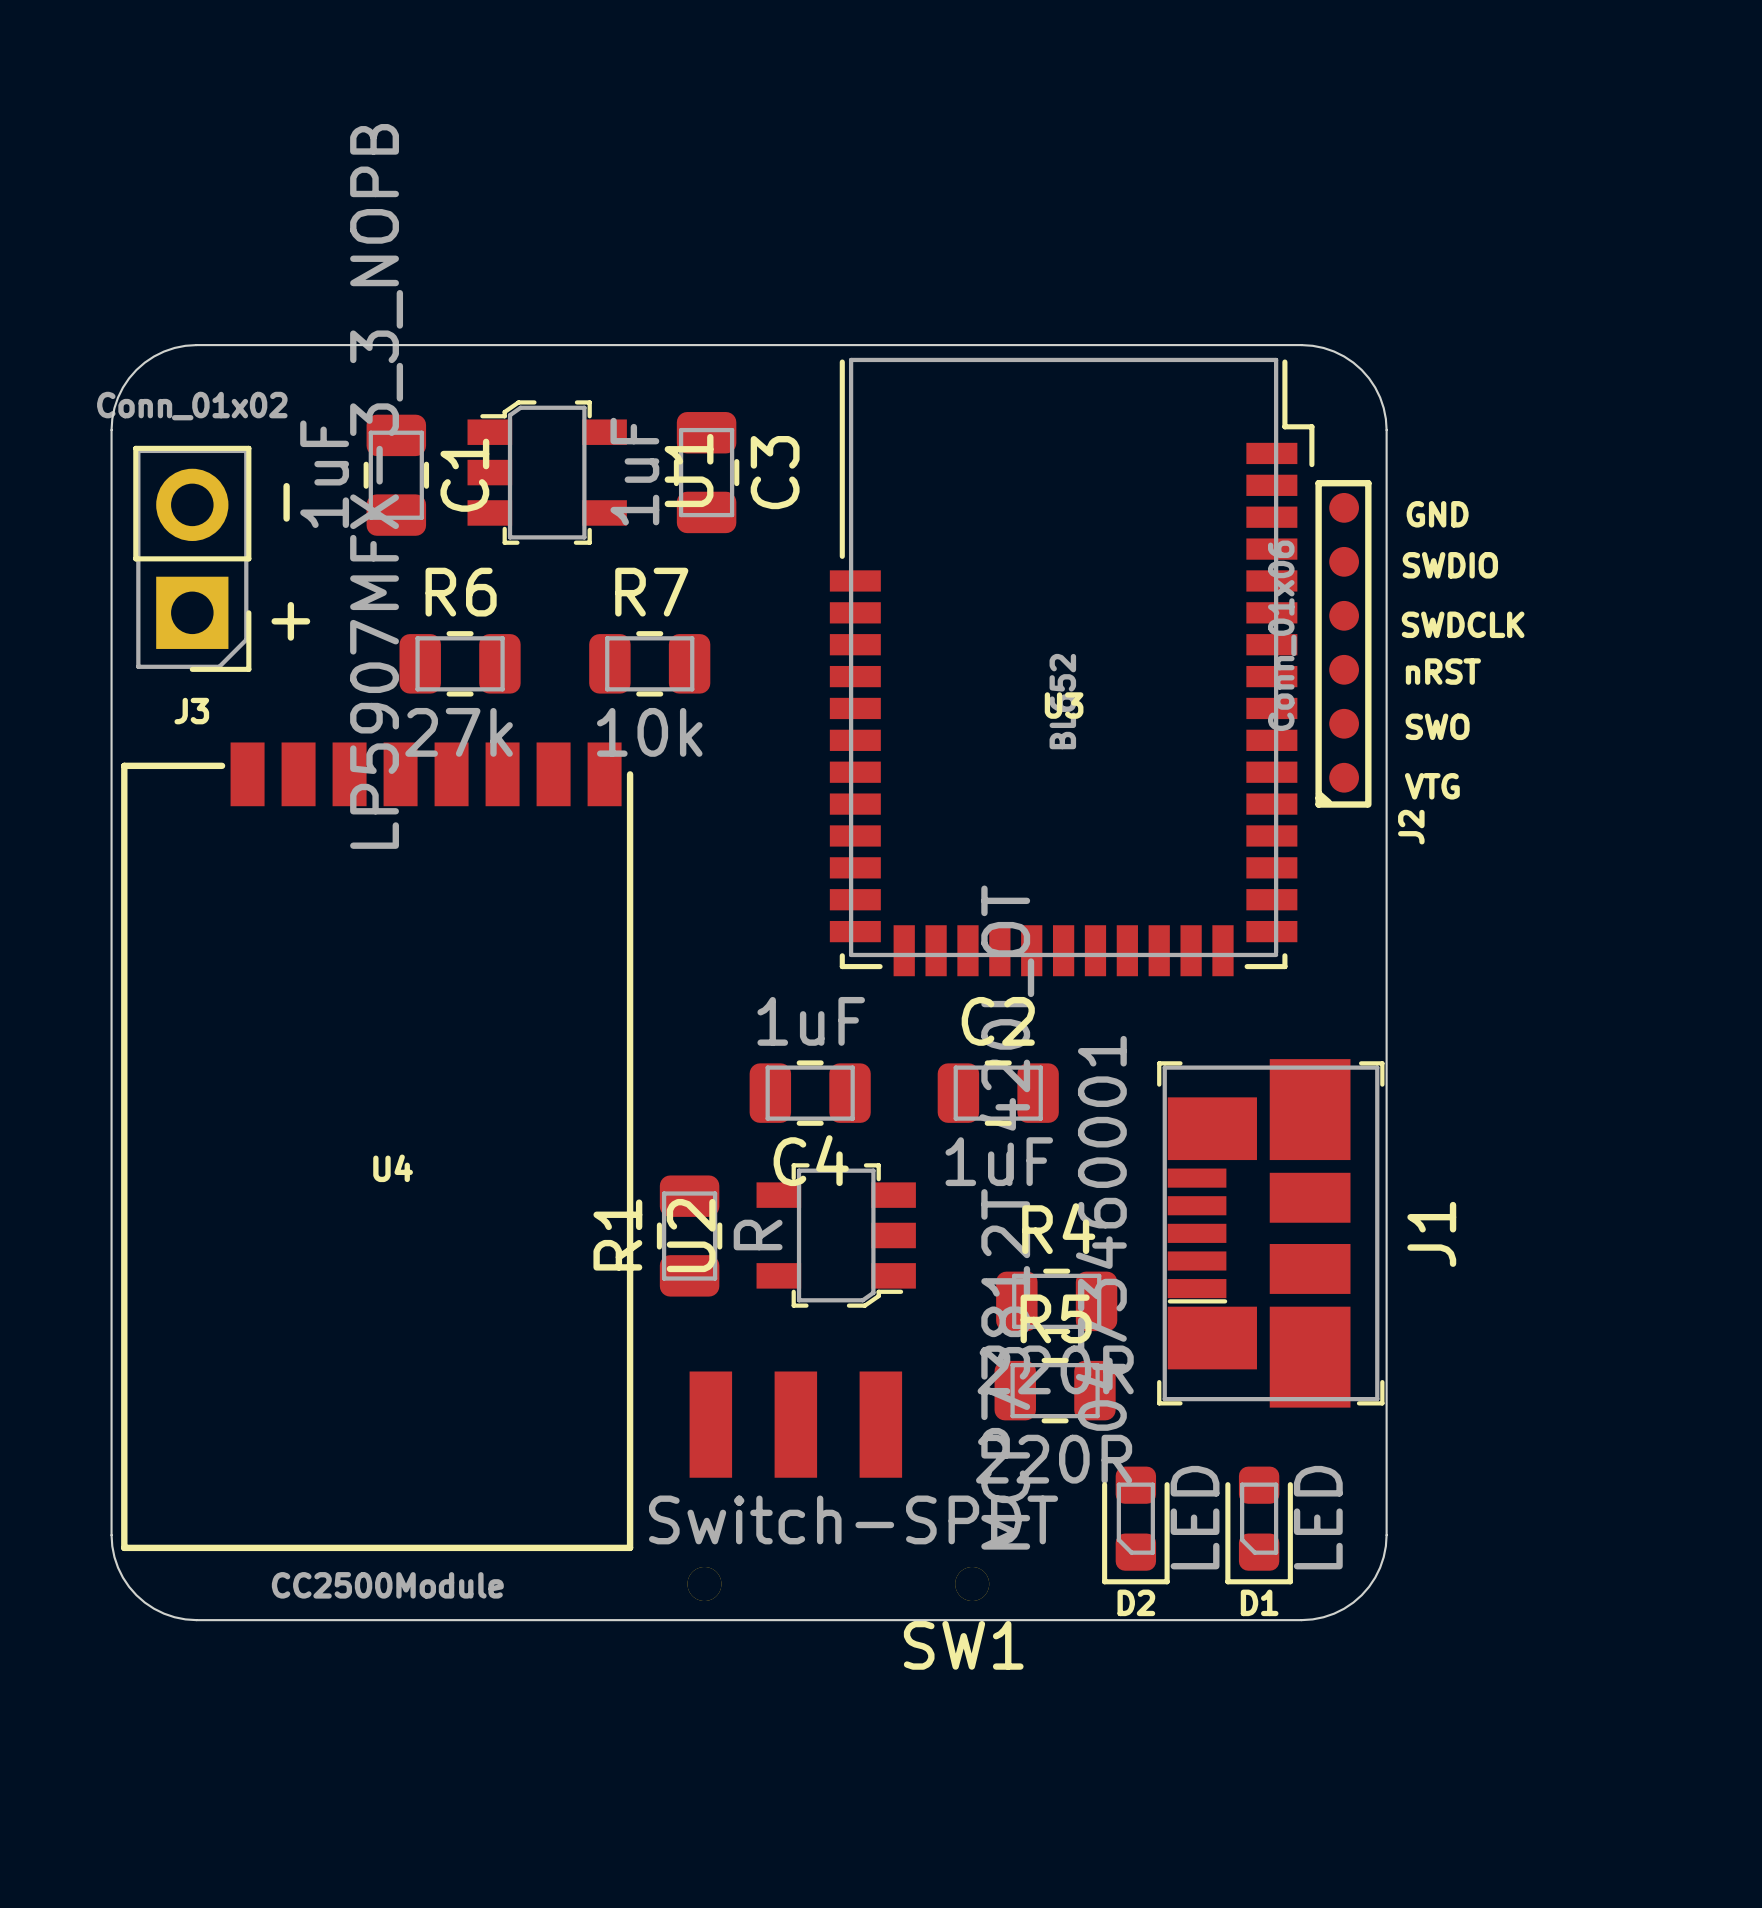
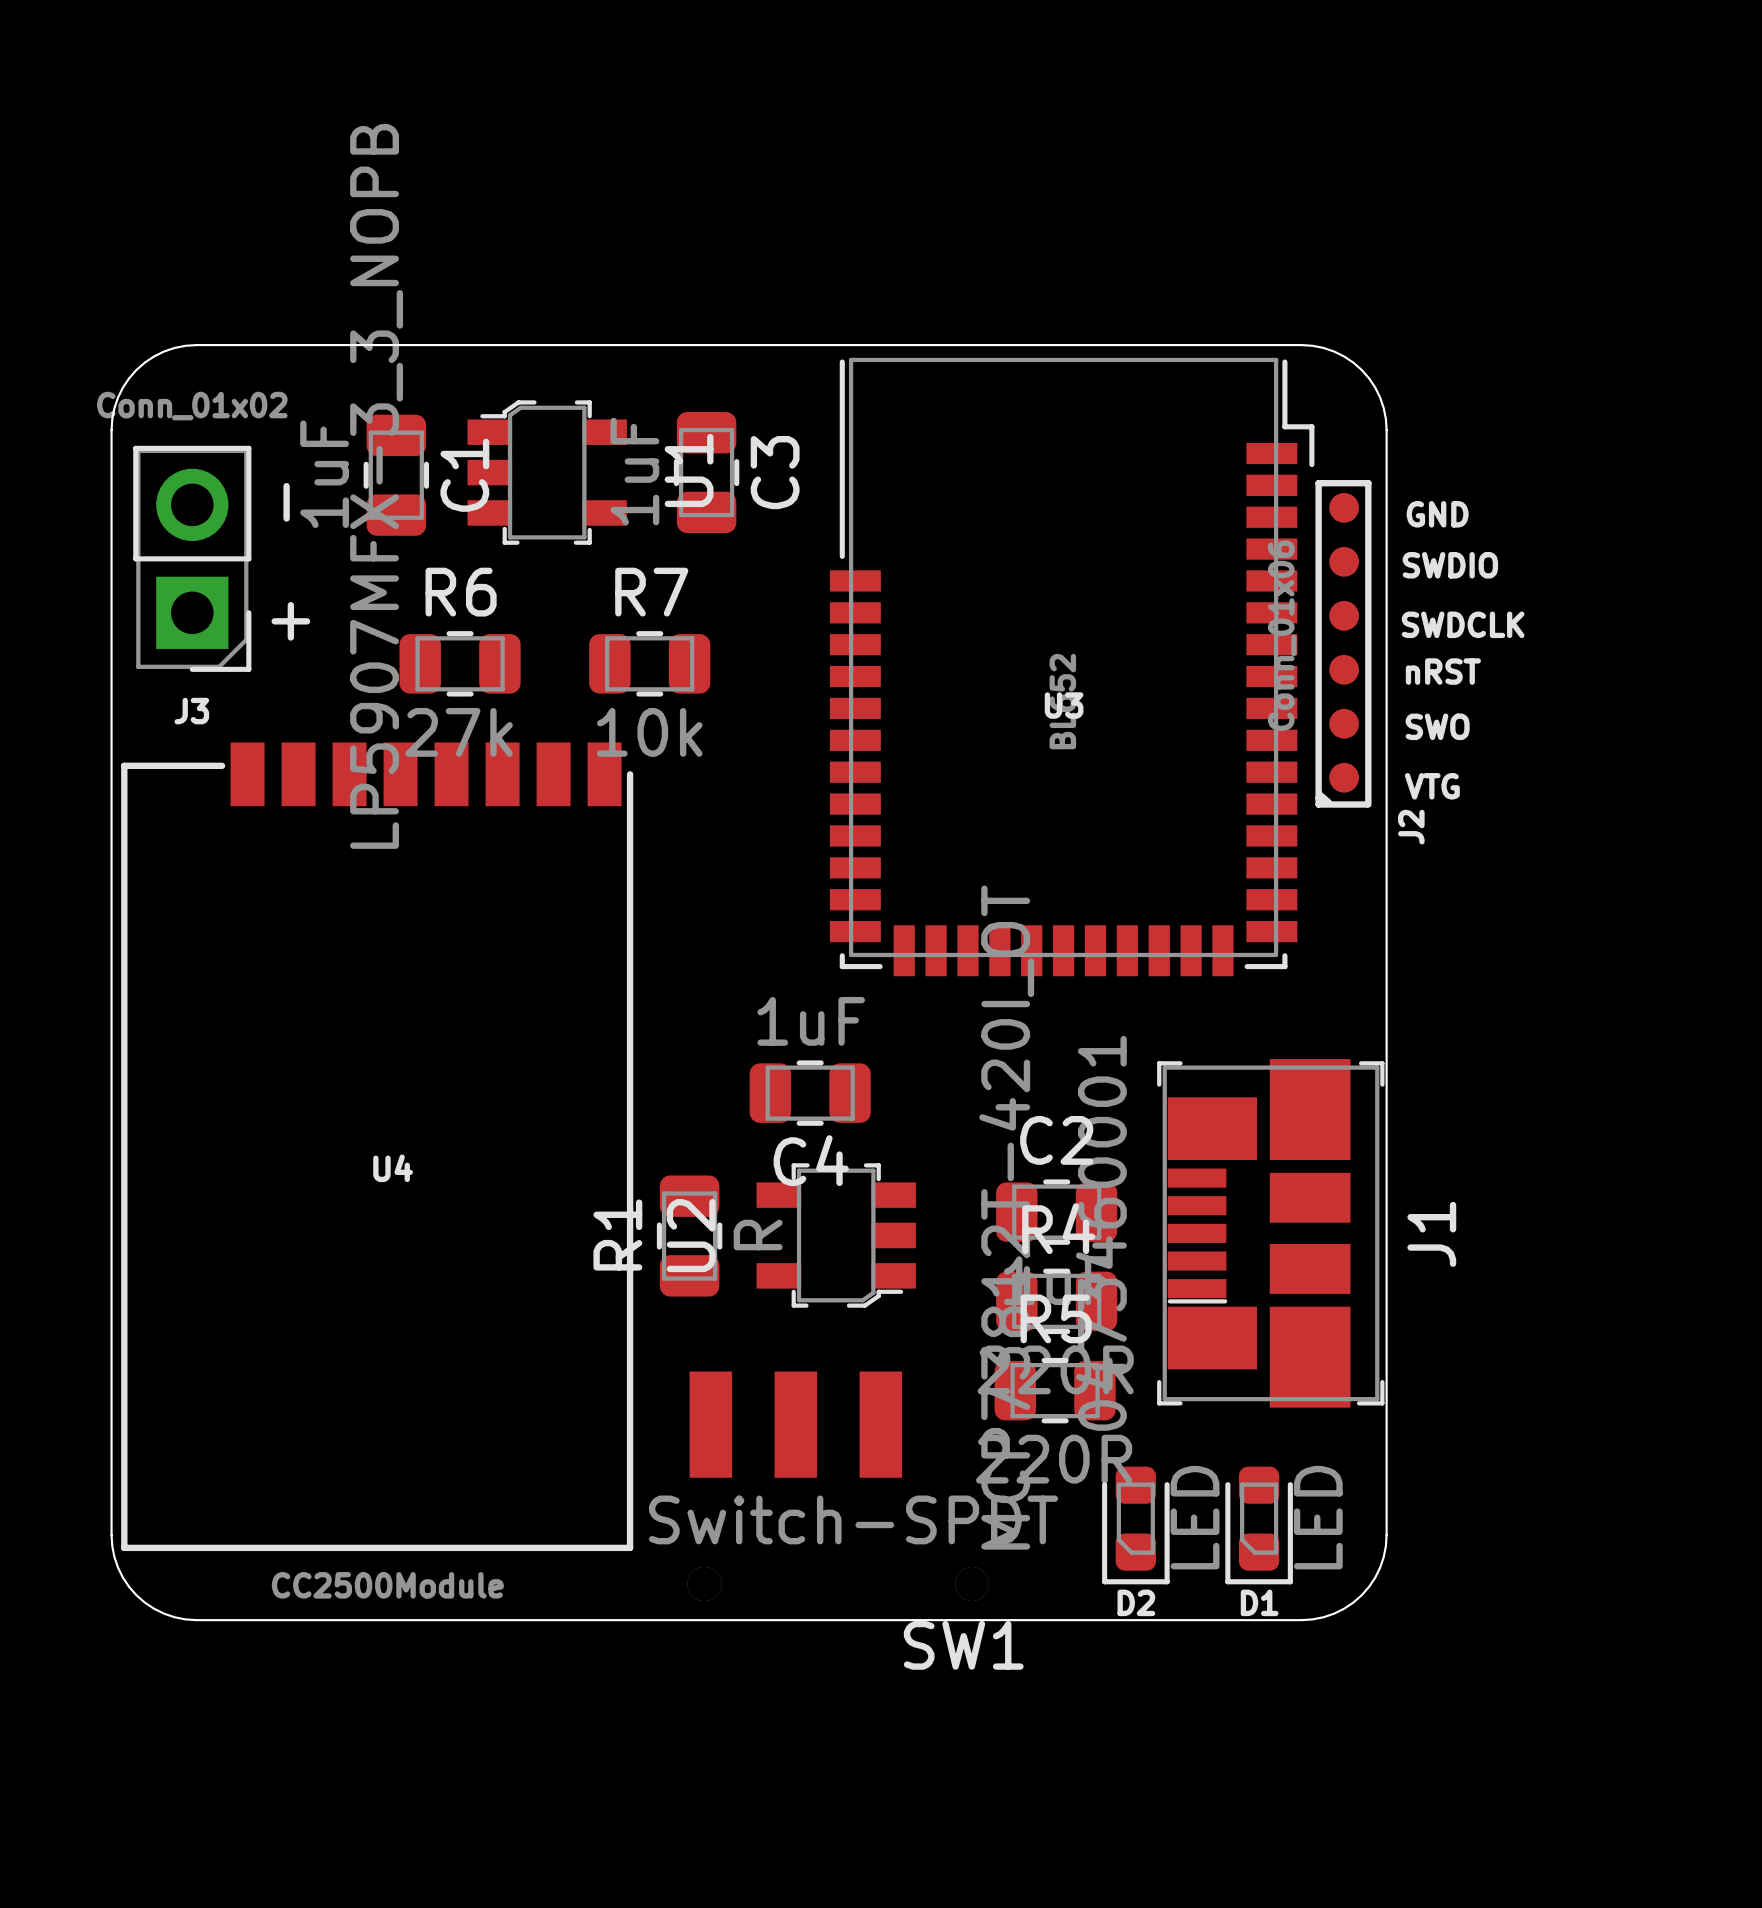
C2 position: (998, 1093) -> (1056, 1212)

